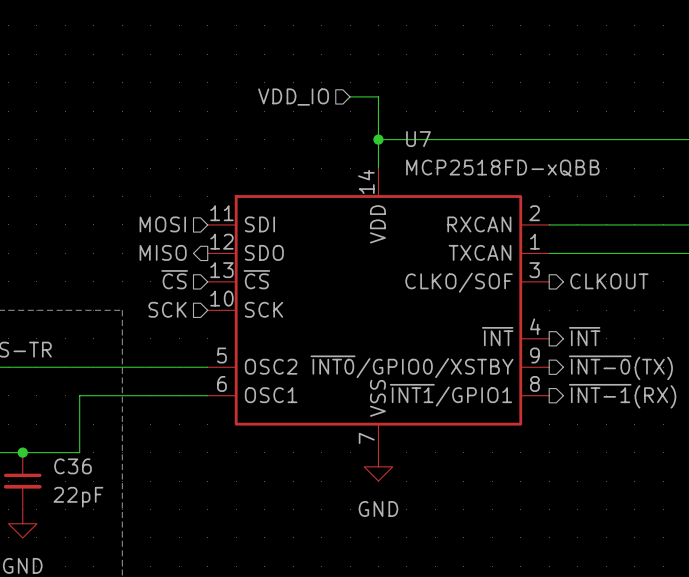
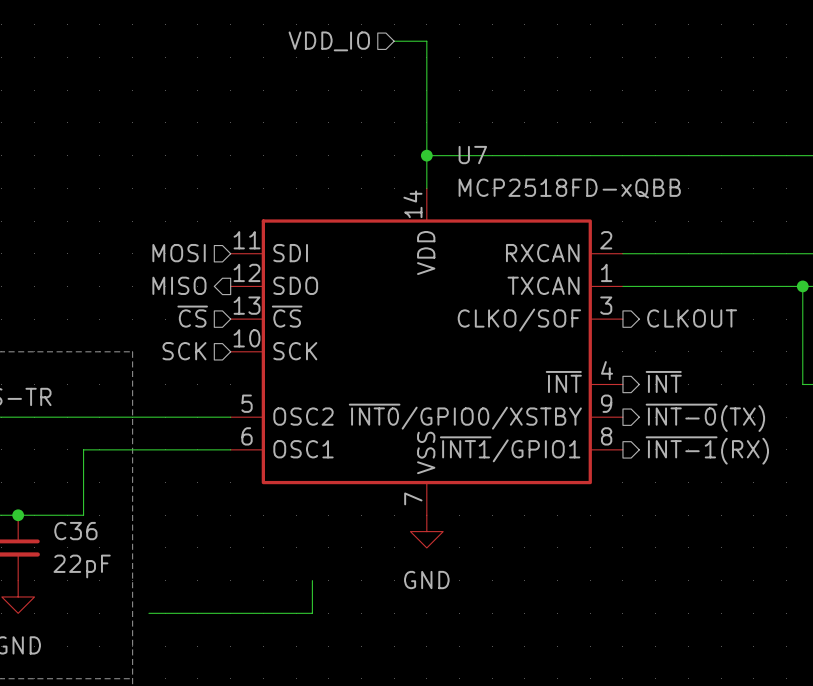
wire: (350, 96) (378, 96) -> (394, 41) (426, 41) (426, 106)
hierarchical label position: VDD_IO (293, 97) -> VDD_IO (329, 41)
wire: none -> (312, 580) (312, 613) (148, 613)

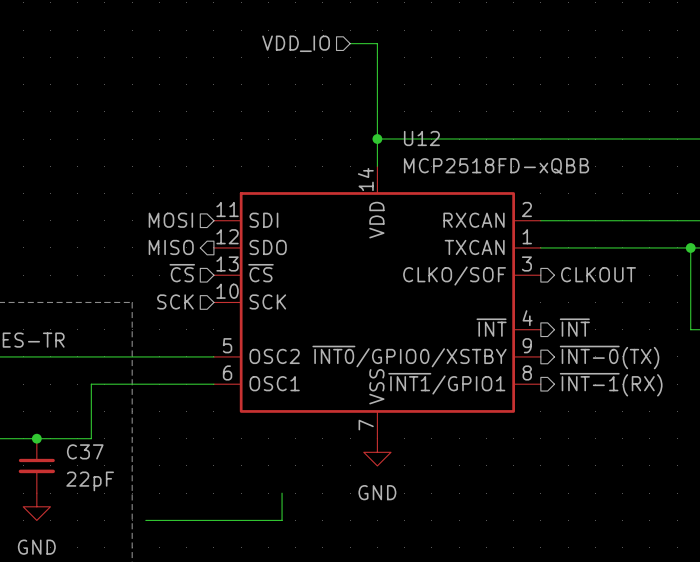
U7 name: U7 (472, 155) -> U12 (421, 138)
C36 name: C36 (75, 531) -> C37 (85, 451)

